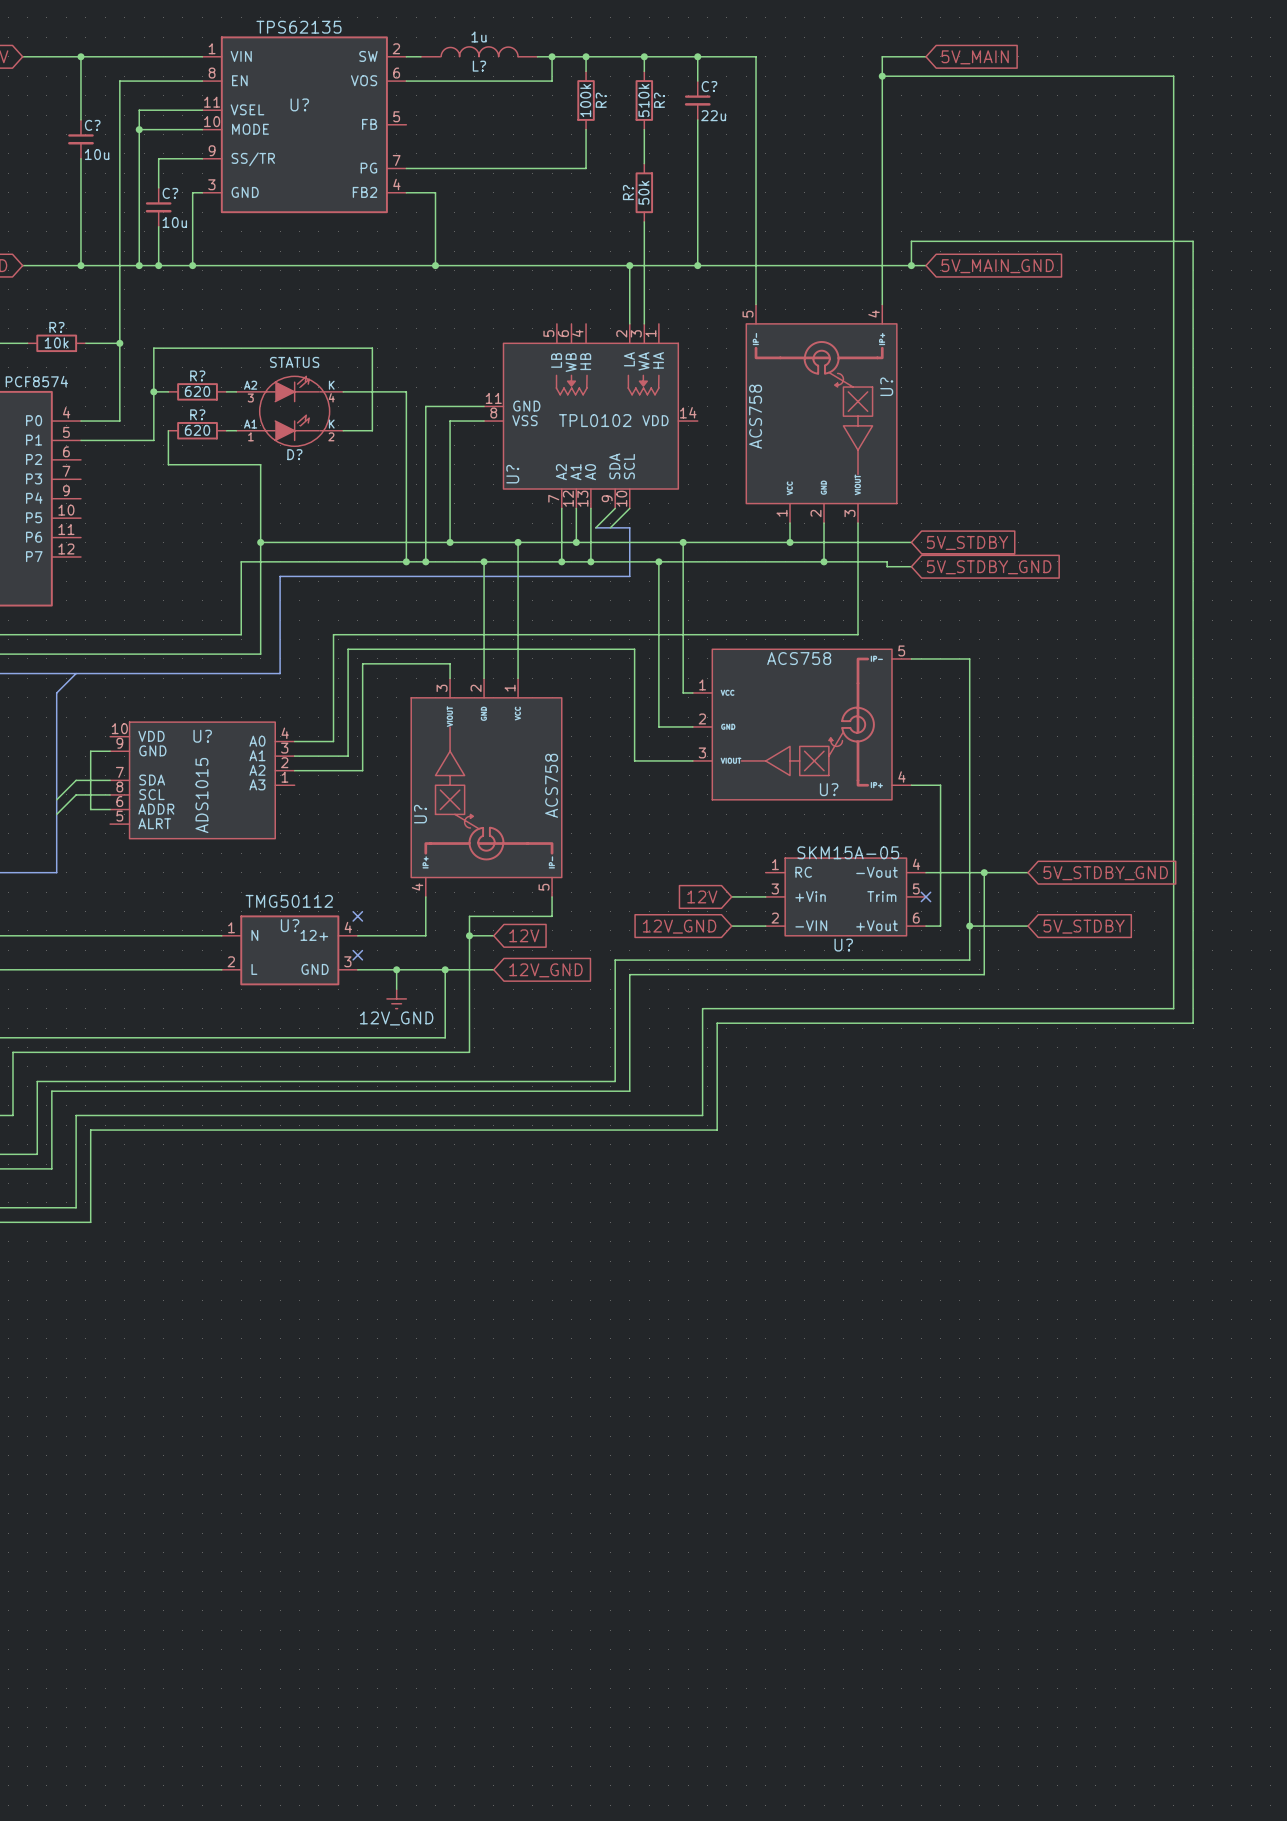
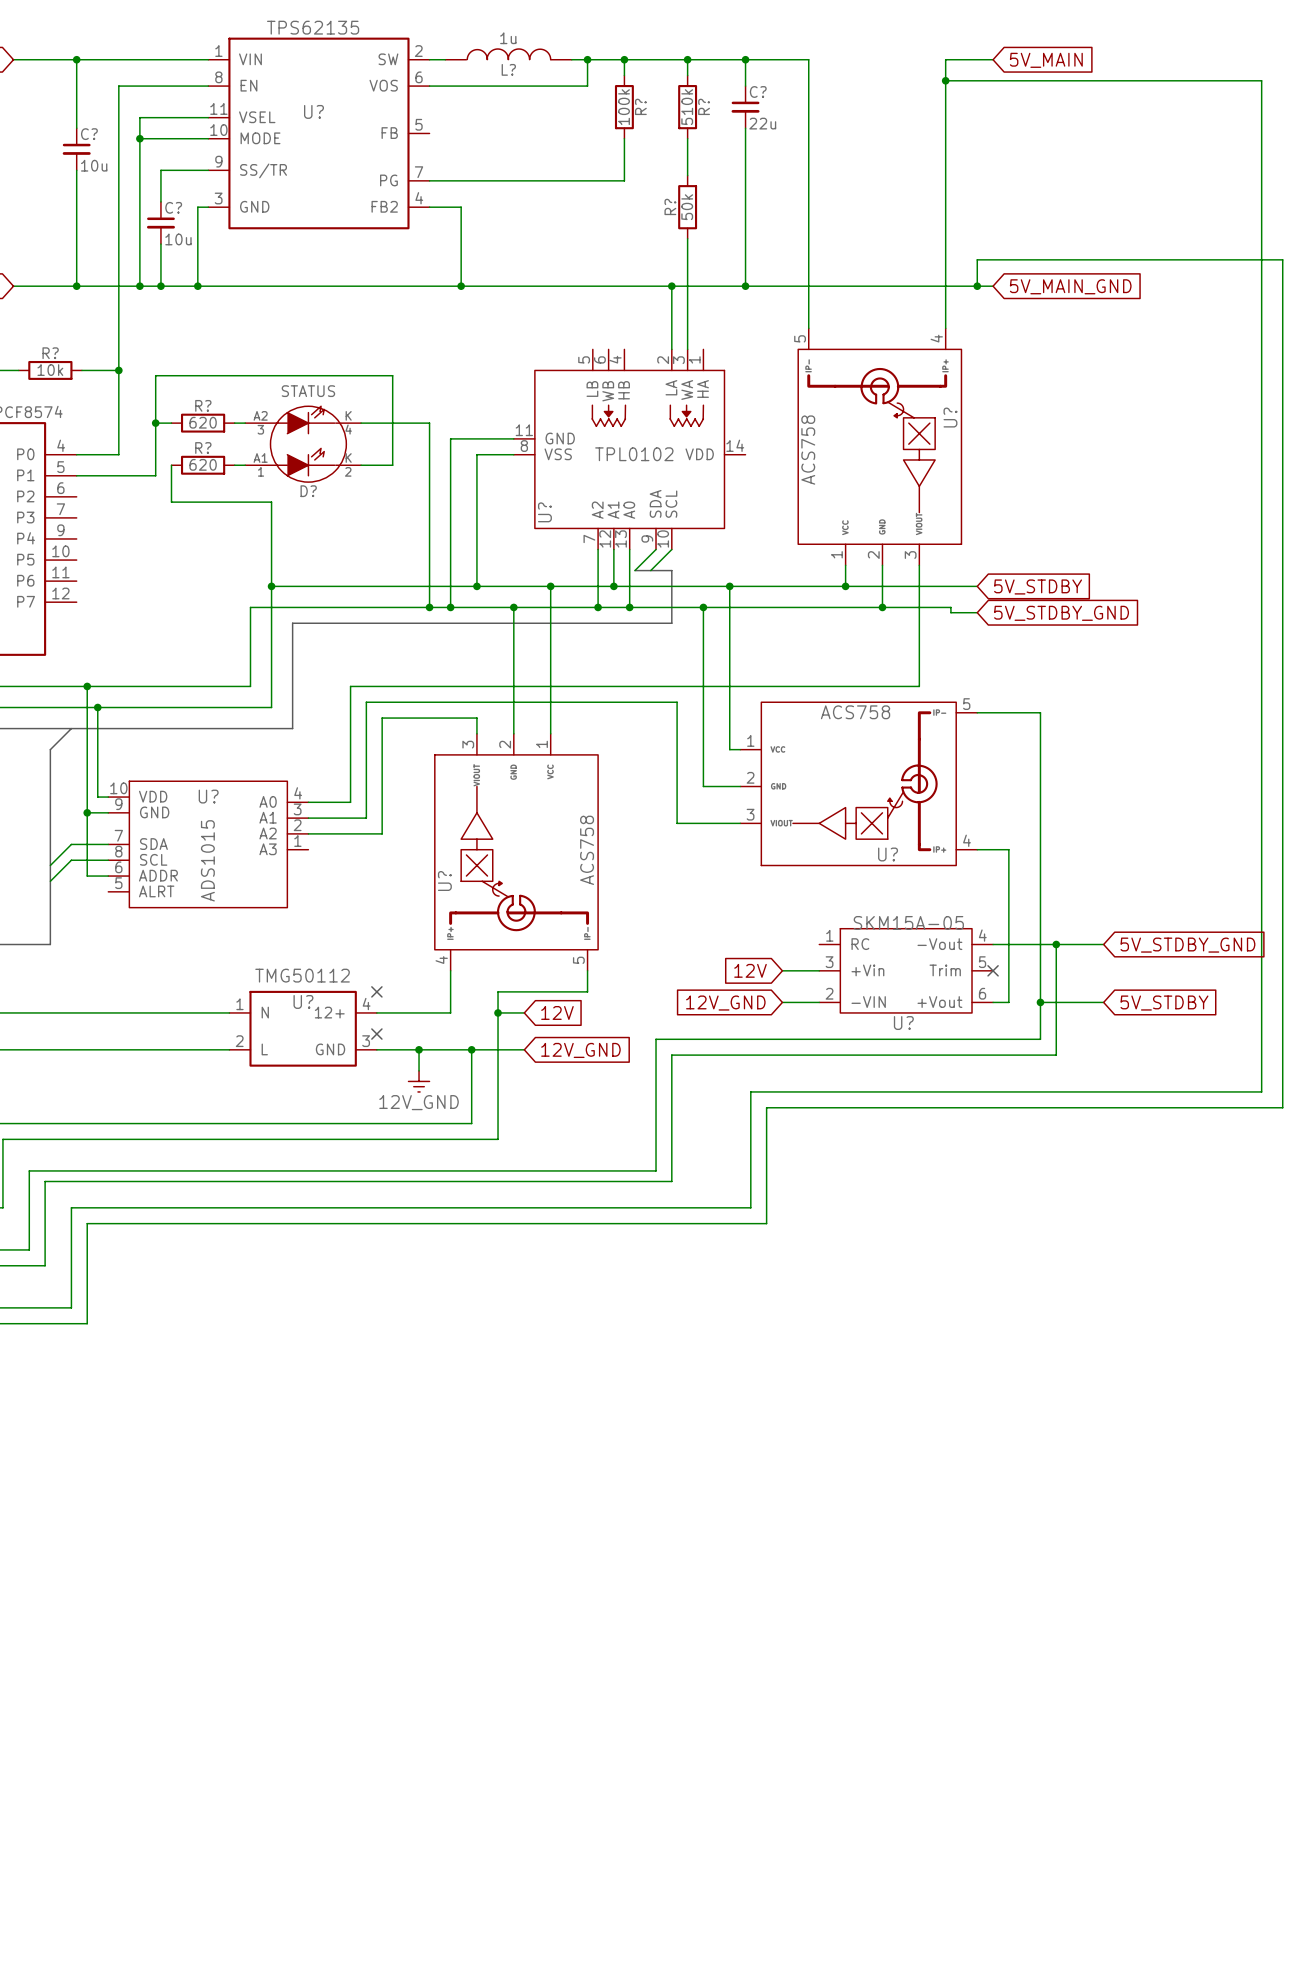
wire: none -> (87, 686) (87, 812)
junction: none -> (87, 686)
wire: none -> (97, 707) (97, 797) (108, 797)
junction: none -> (97, 707)
junction: none -> (87, 812)

